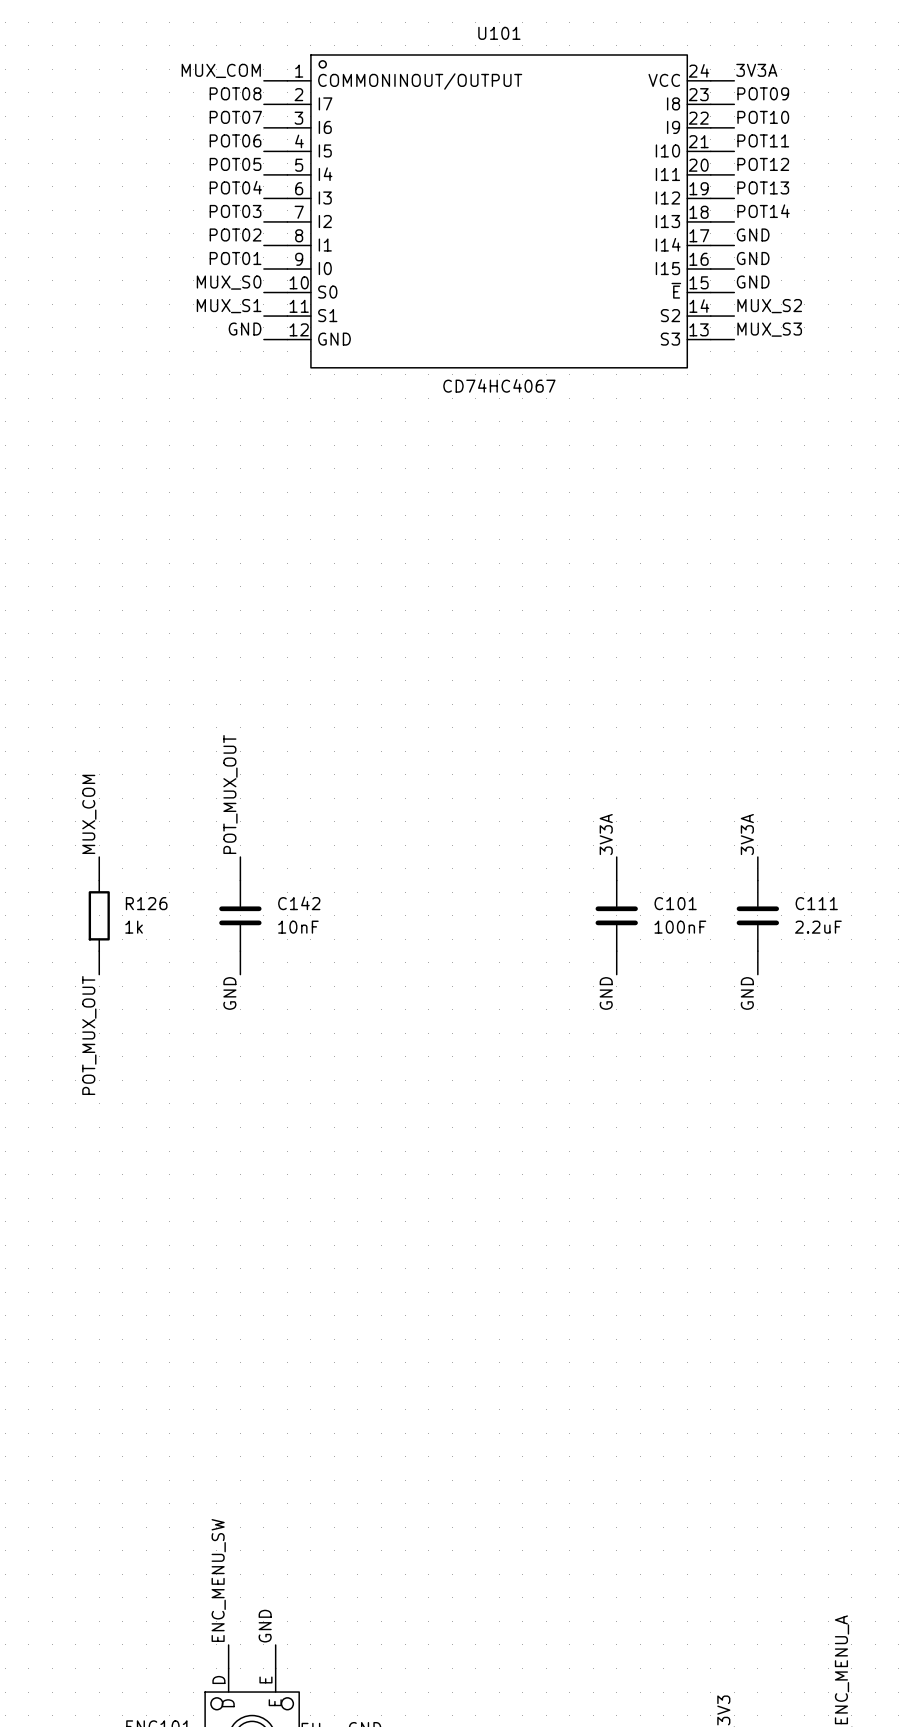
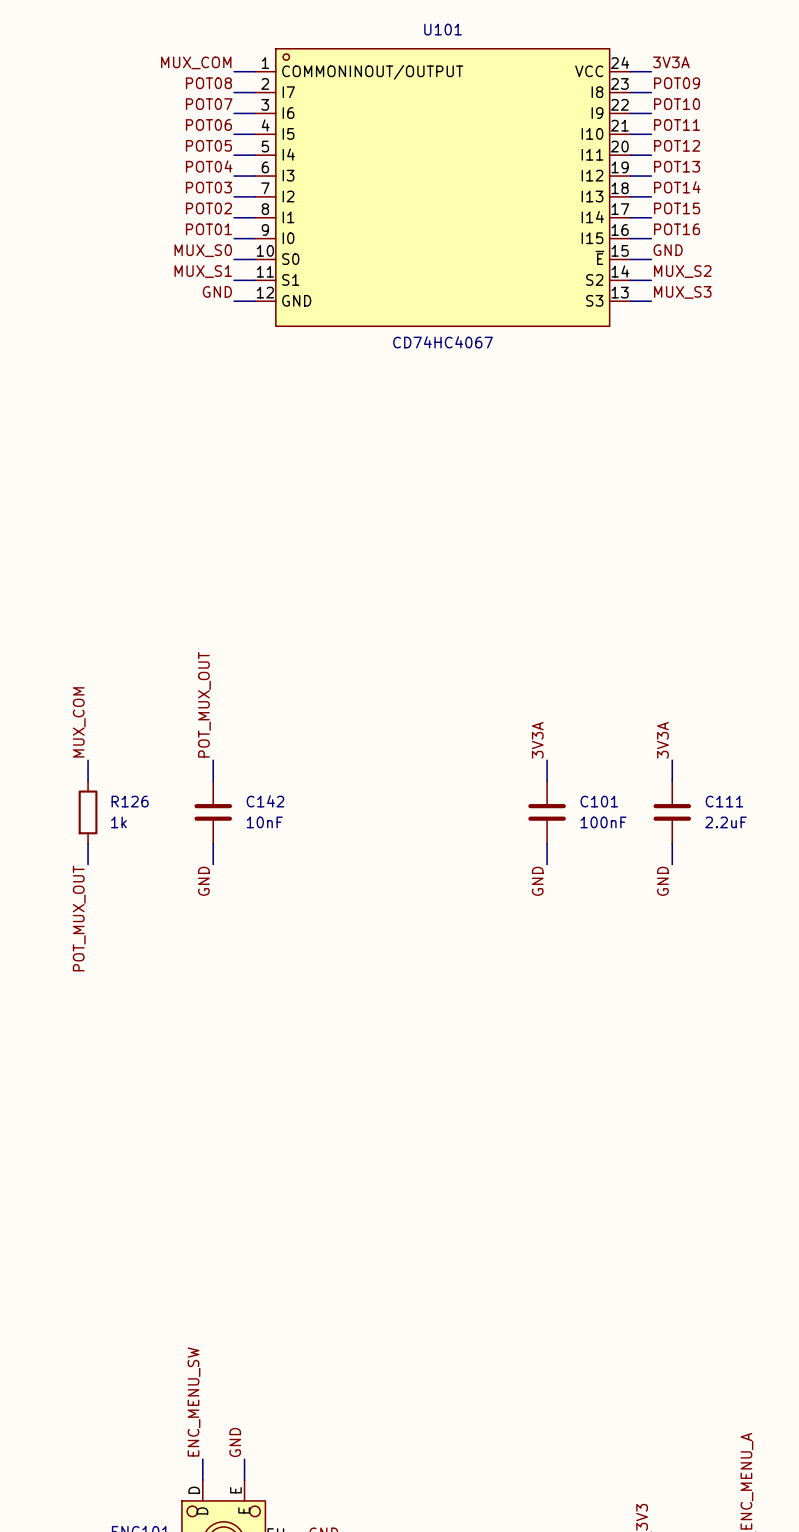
label: GND (753, 234) -> POT15 (677, 208)
label: GND (753, 258) -> POT16 (677, 229)

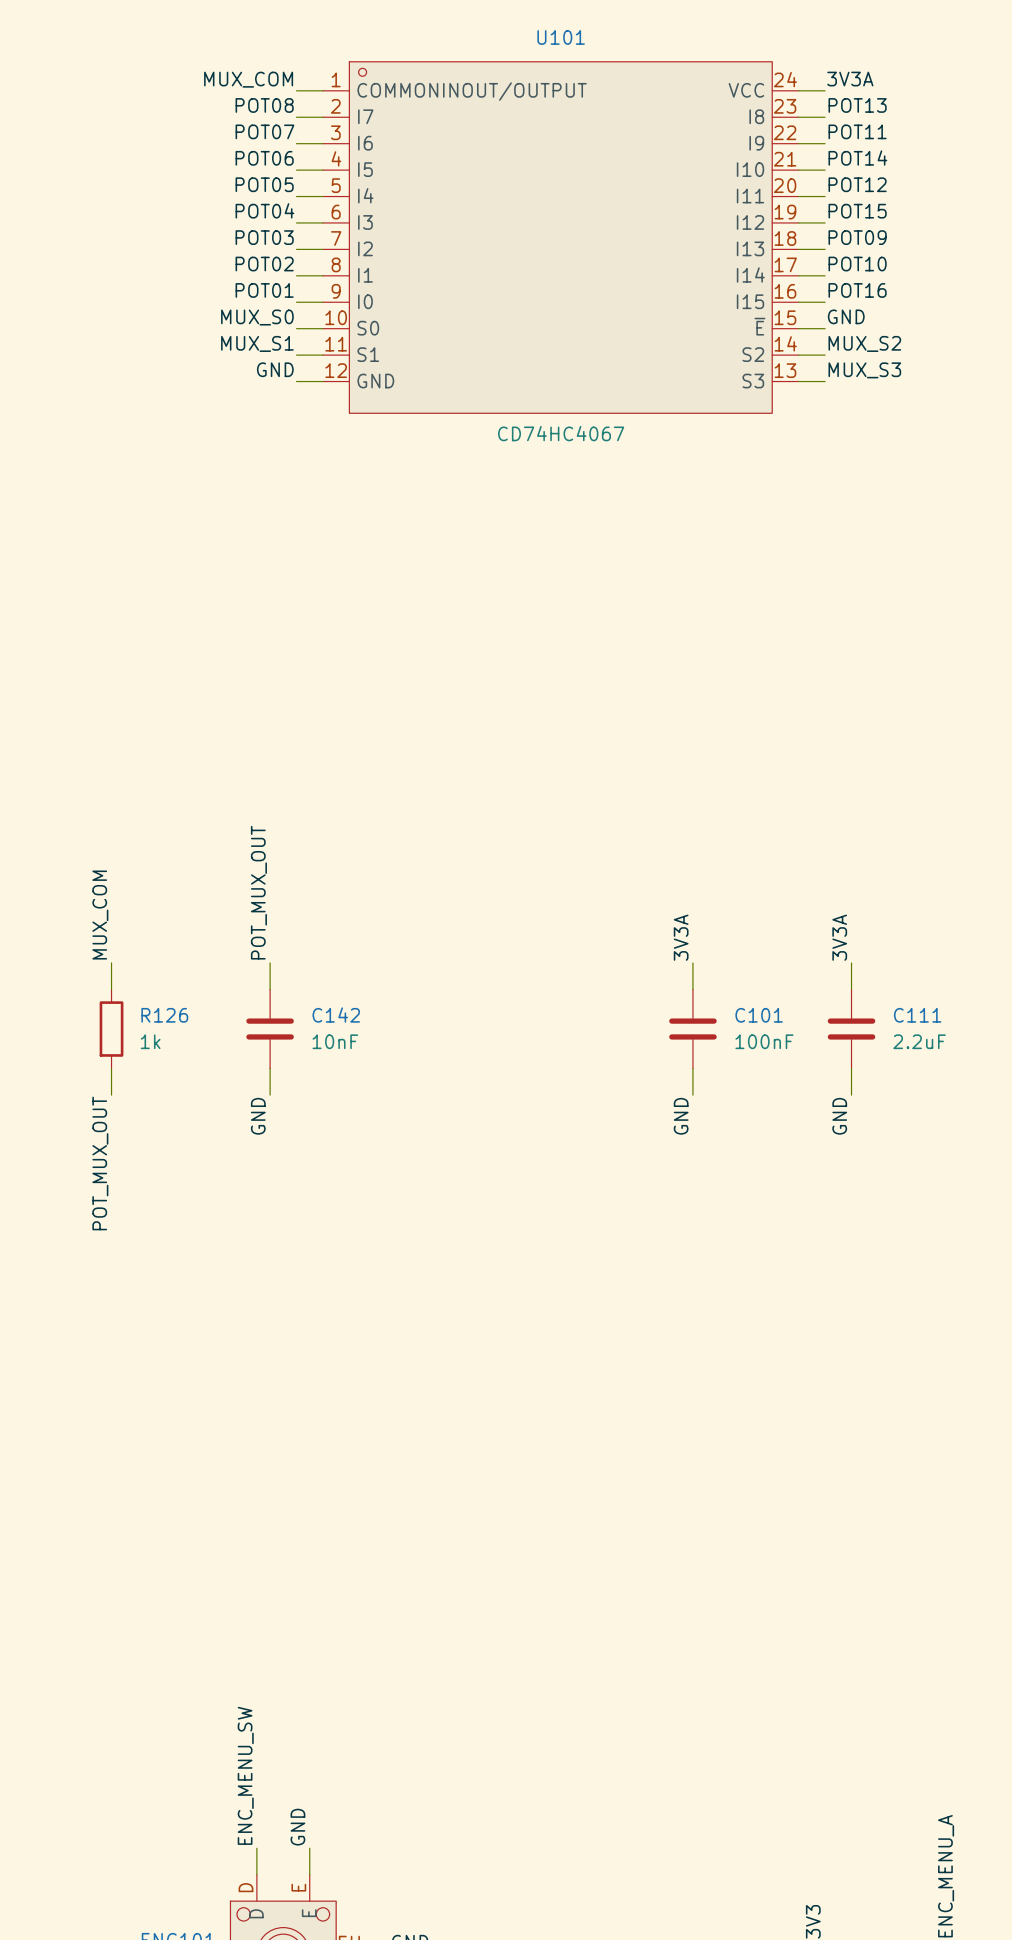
label: POT09 (677, 83) -> POT13 (857, 105)
label: POT10 (677, 104) -> POT11 (857, 131)
label: POT11 (677, 124) -> POT14 (857, 158)
label: POT13 (677, 166) -> POT15 (857, 211)
label: POT14 (677, 187) -> POT09 (857, 237)
label: POT15 (677, 208) -> POT10 (857, 264)

